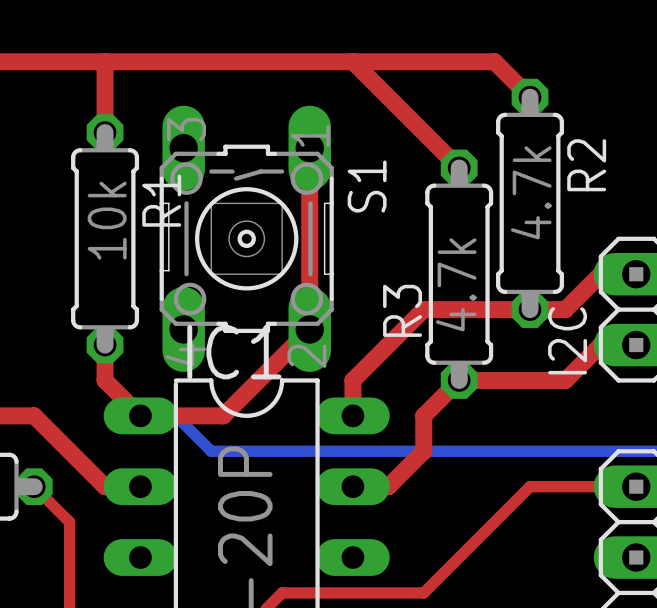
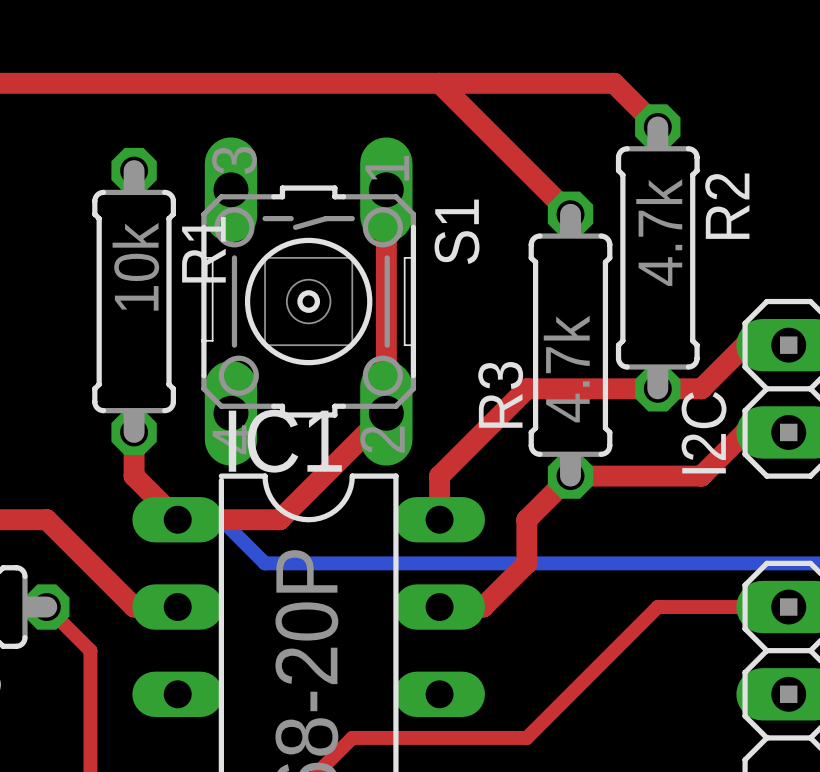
top track: (105, 61) (105, 132) -> none

